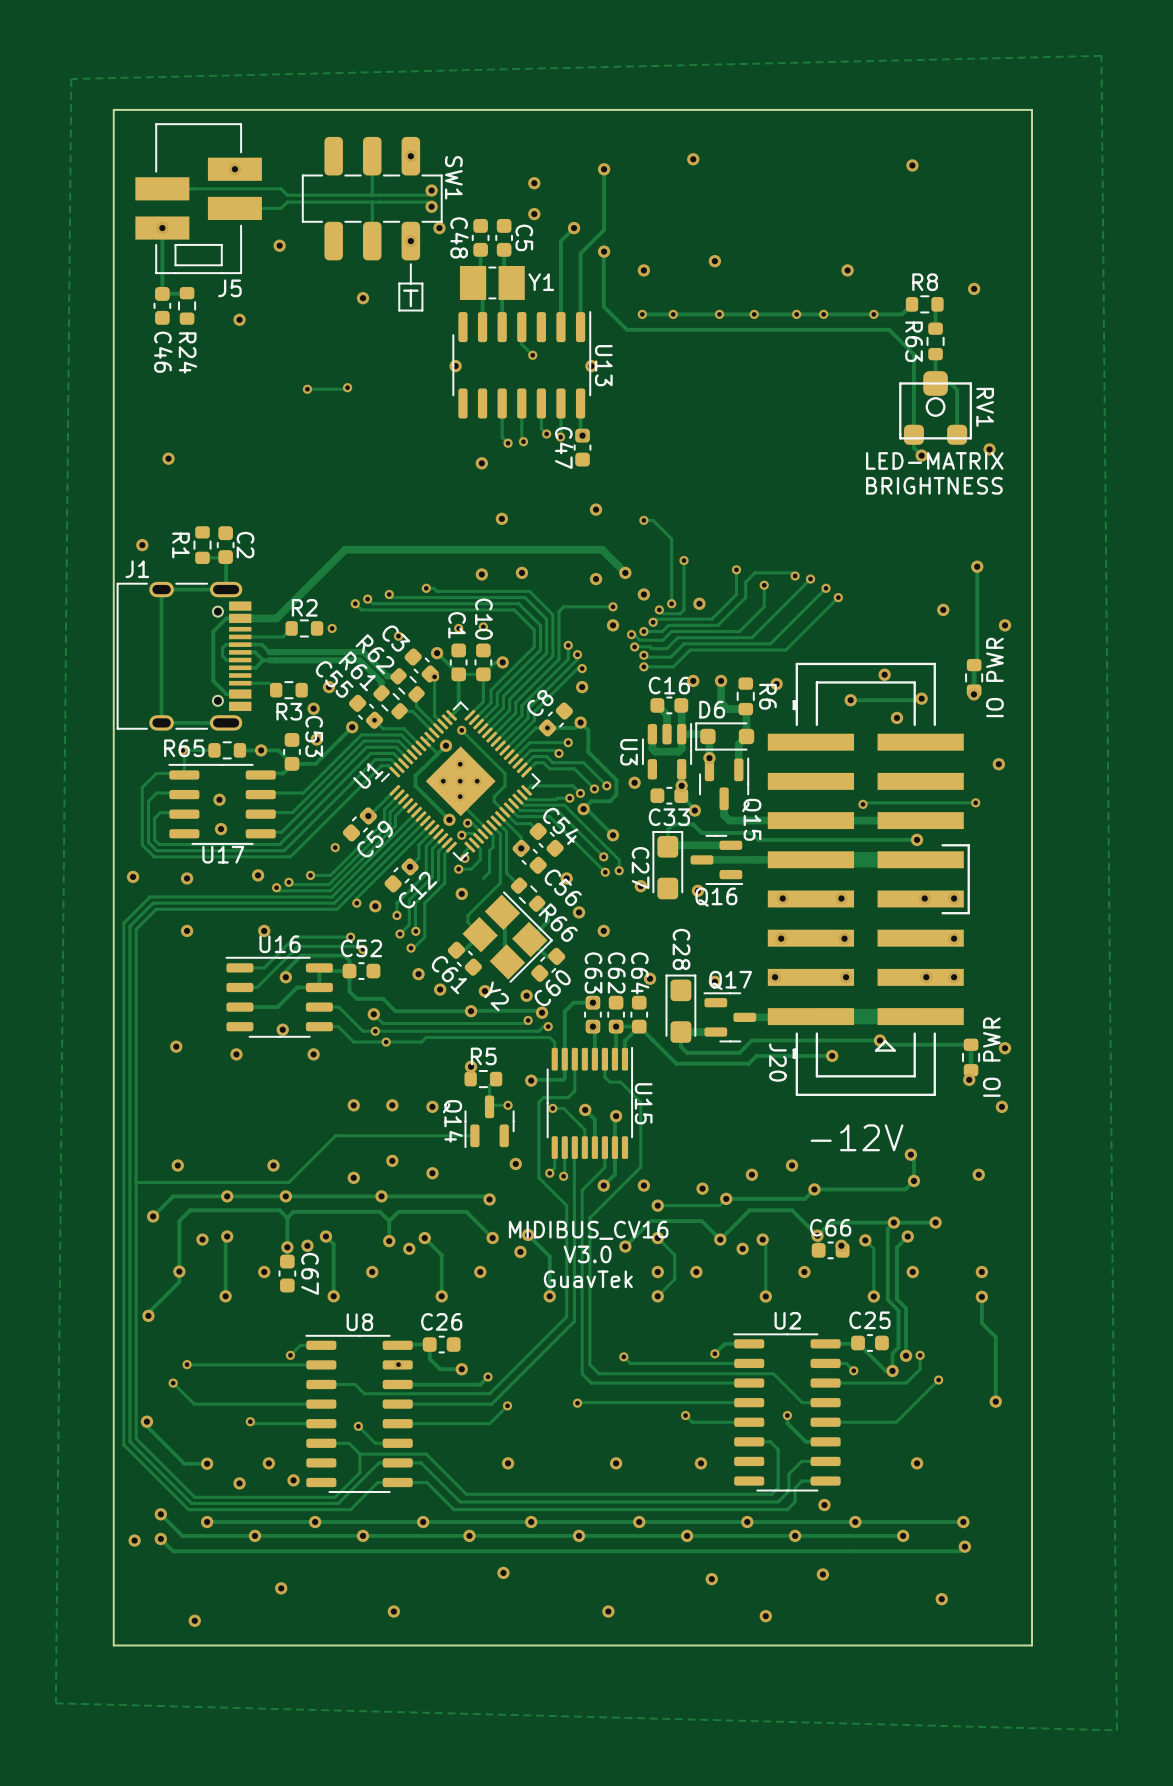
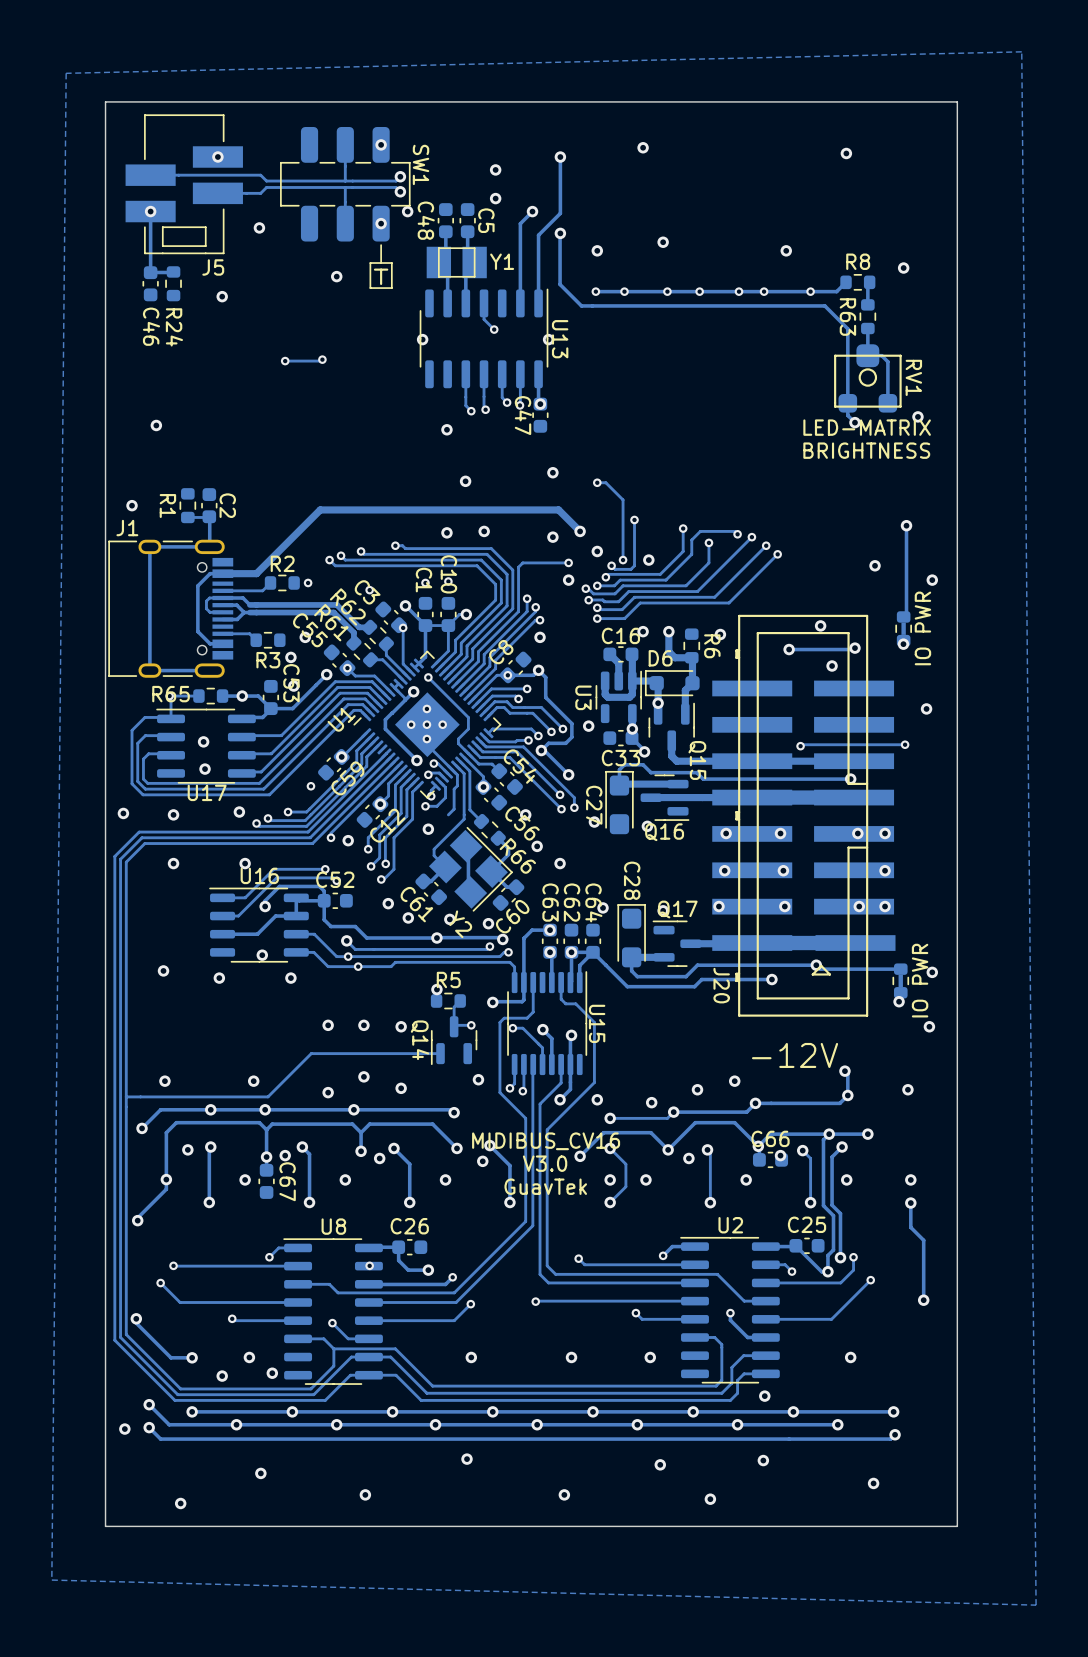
Y1 footprint: [459, 265, 525, 300] -> [426, 246, 487, 279]
J20 footprint: [767, 662, 970, 1096] -> [712, 614, 896, 1017]

